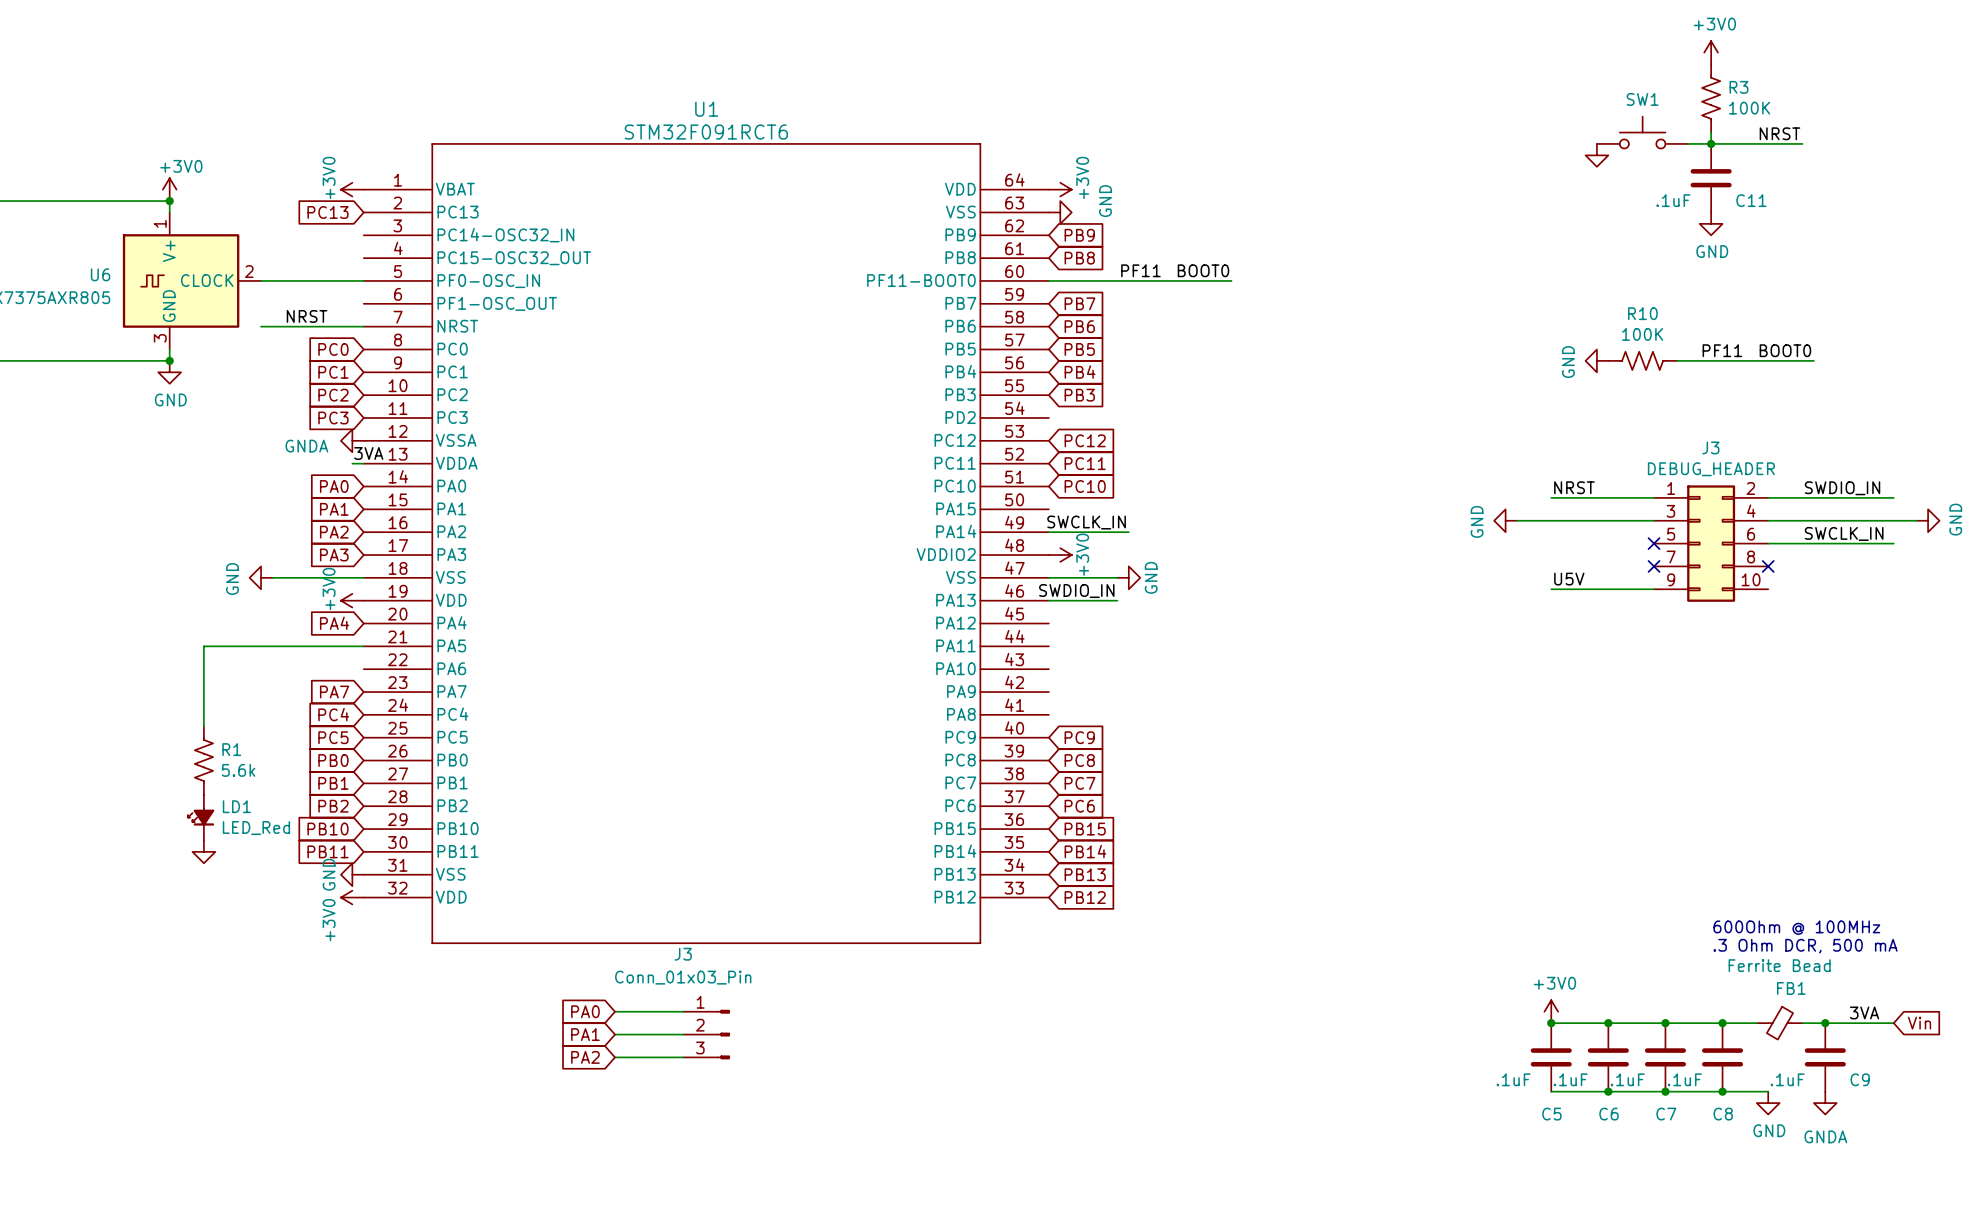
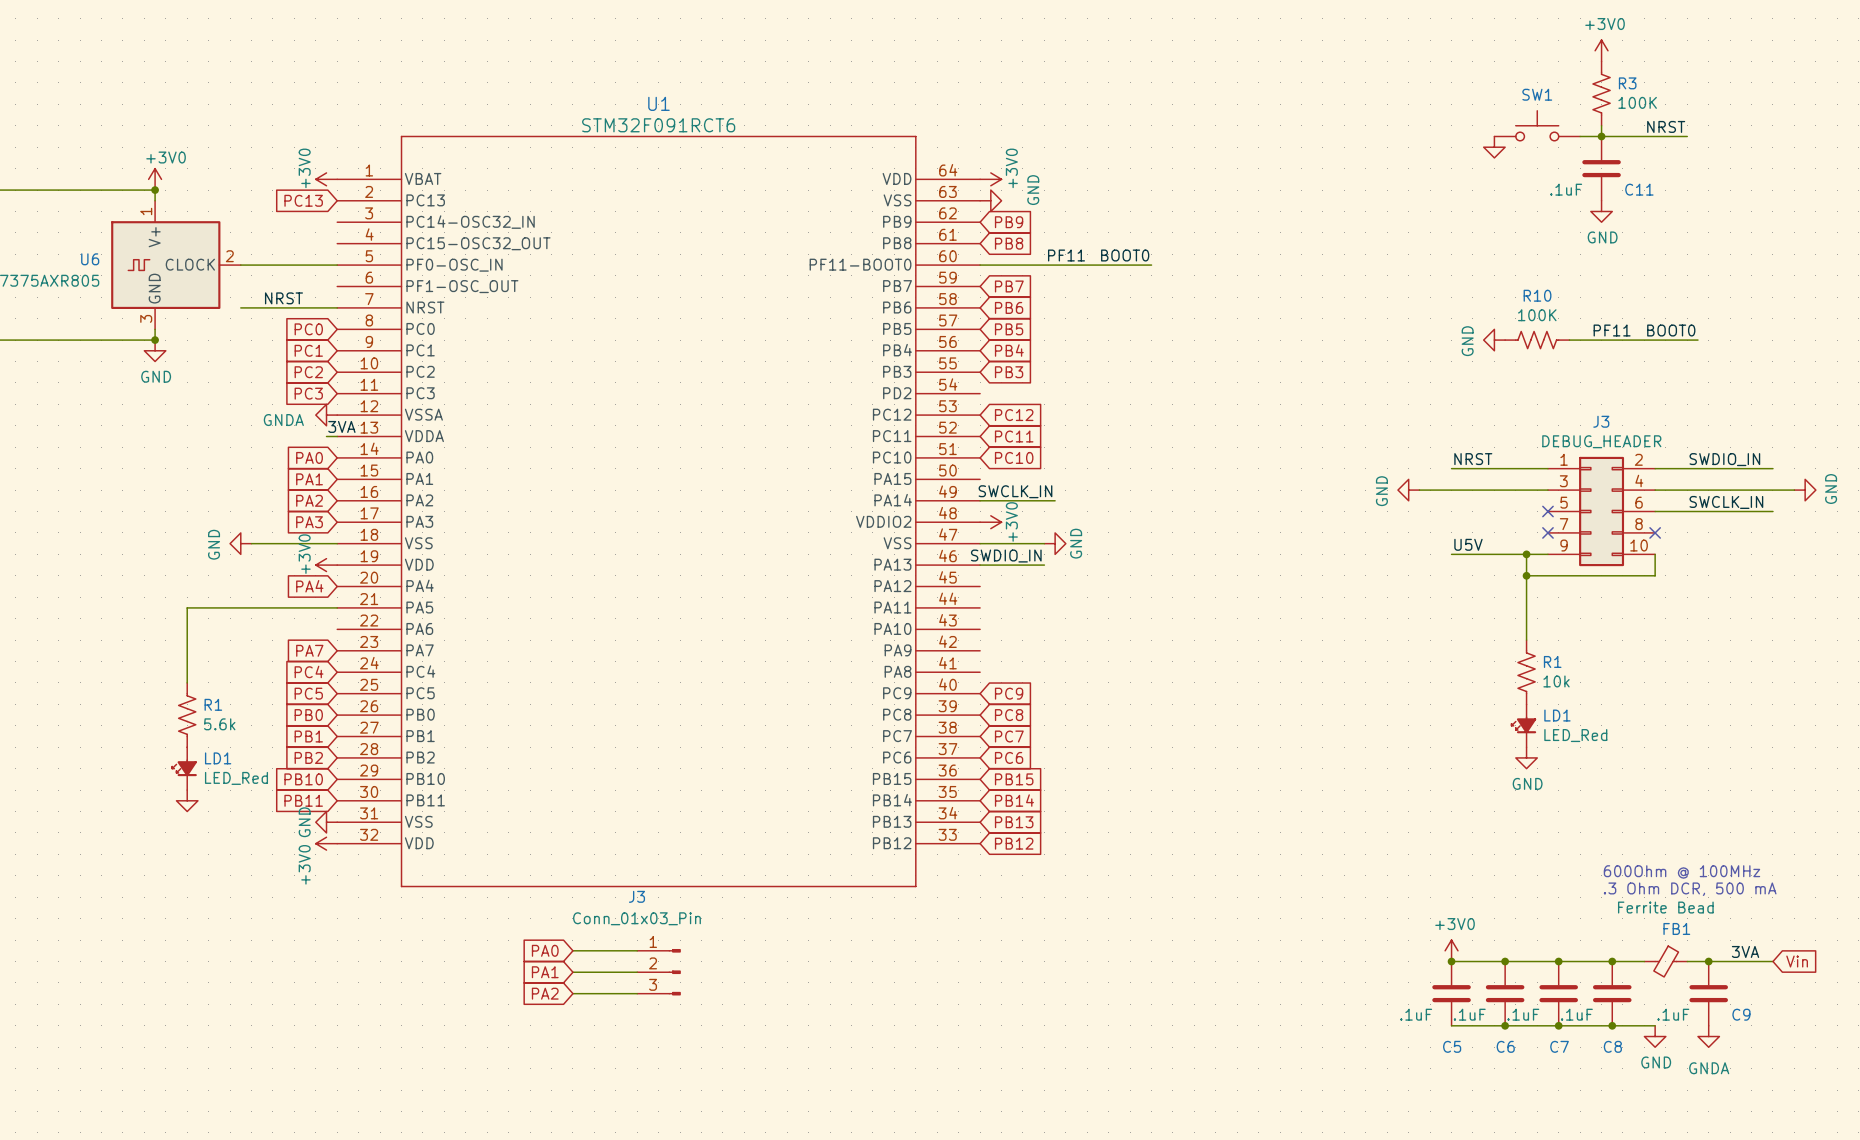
wire: none -> (1526, 554) (1526, 640)
junction: none -> (1526, 554)
wire: none -> (1655, 554) (1655, 575) (1526, 575)
junction: none -> (1526, 575)
R1: none -> 10k (1526, 672)
LD1: none -> LED_Red (1523, 725)
power symbol: none -> GND (1526, 757)

